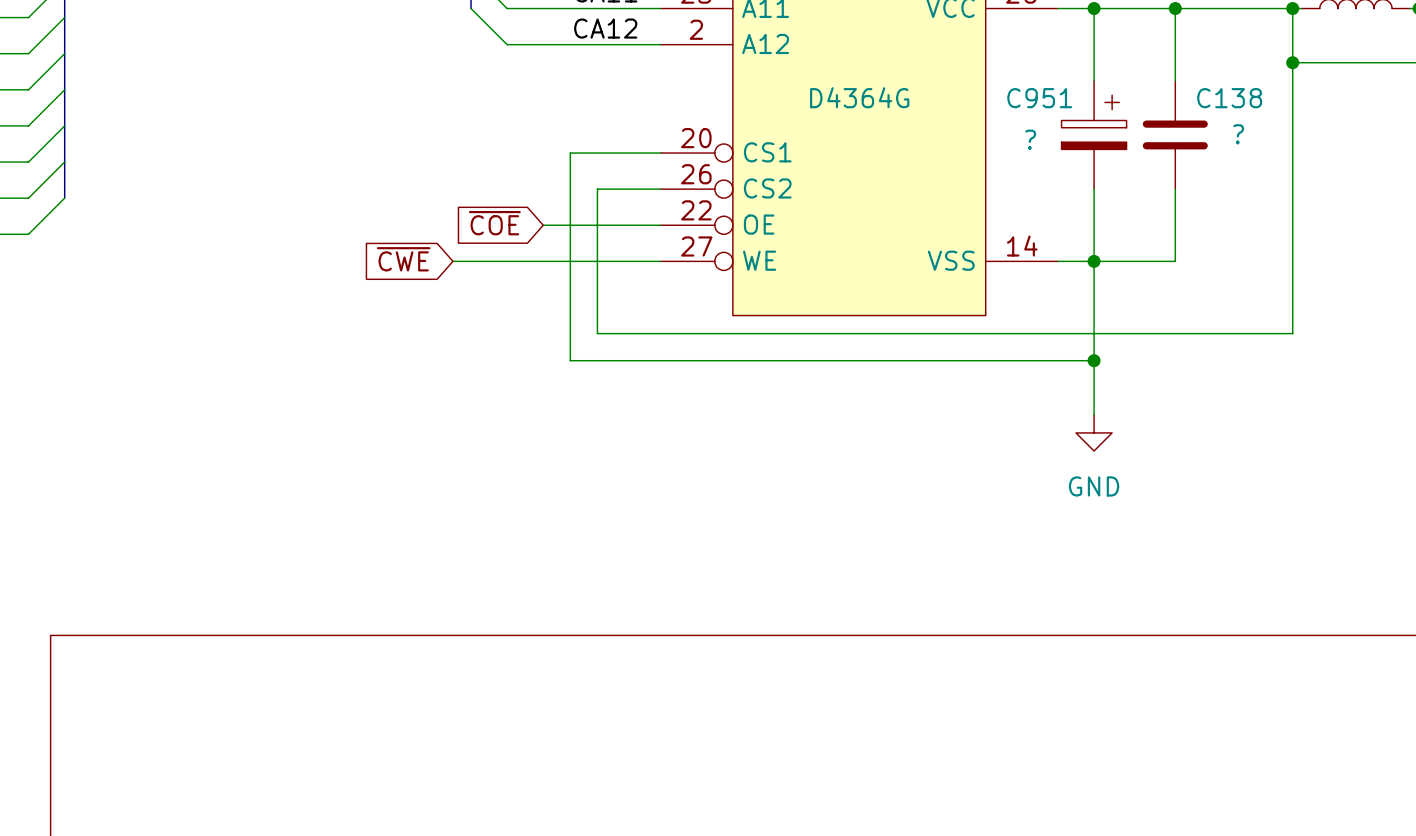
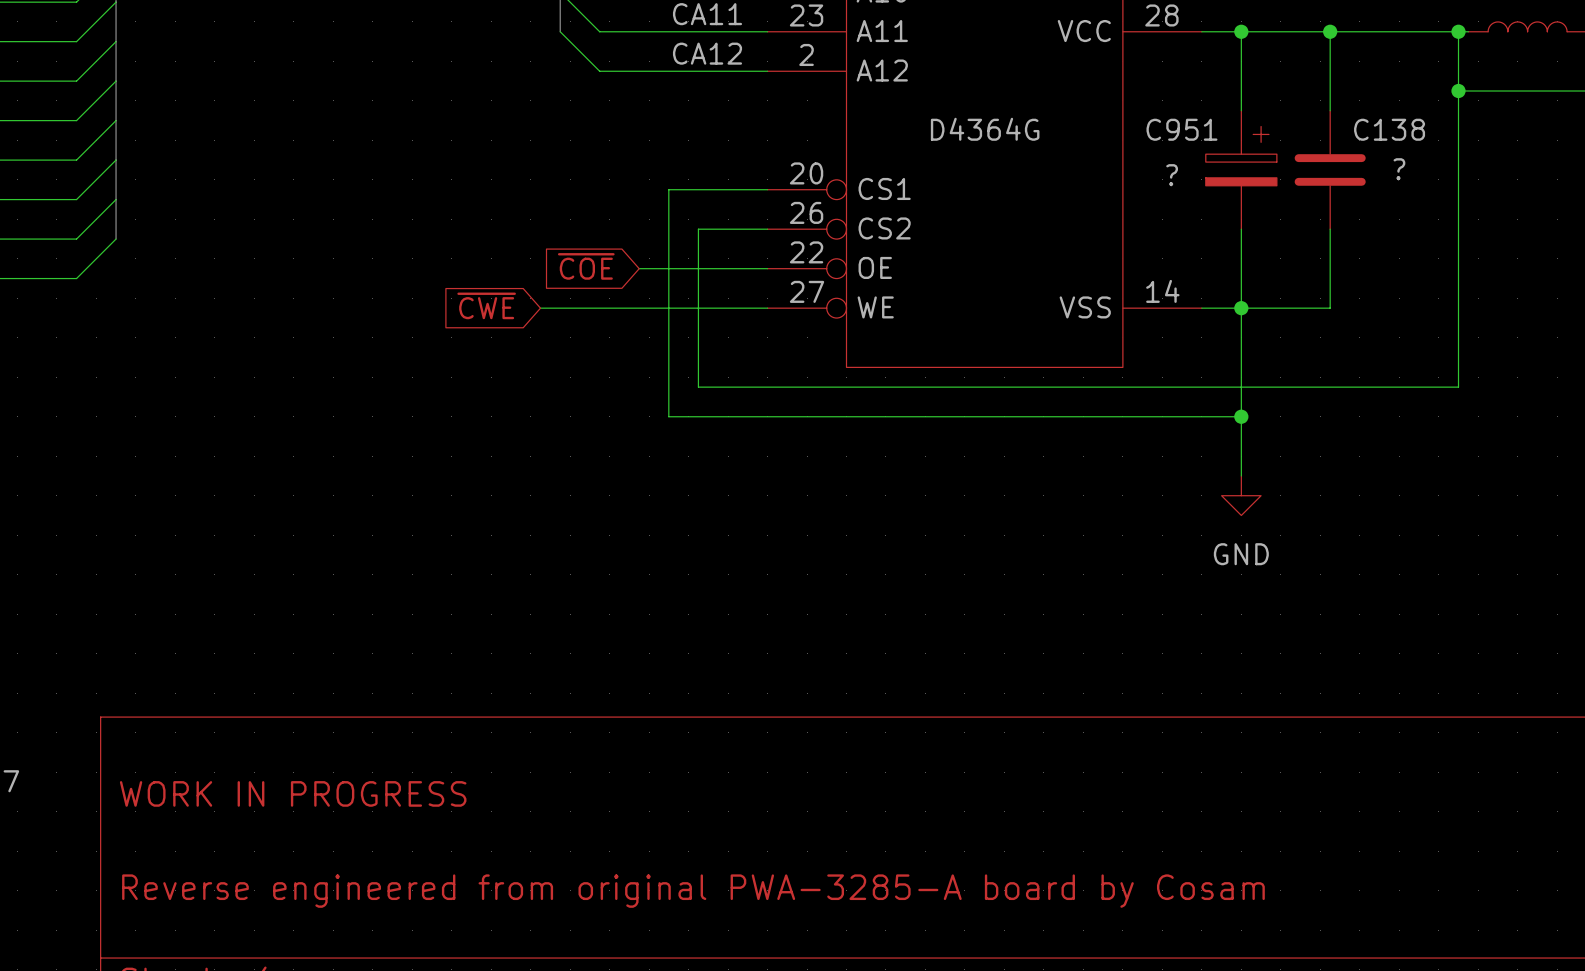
title block: none -> WORK IN PROGRESS (293, 793)
title block: none -> Reverse engineered from original PWA-3285-A board by Cosam (693, 891)

